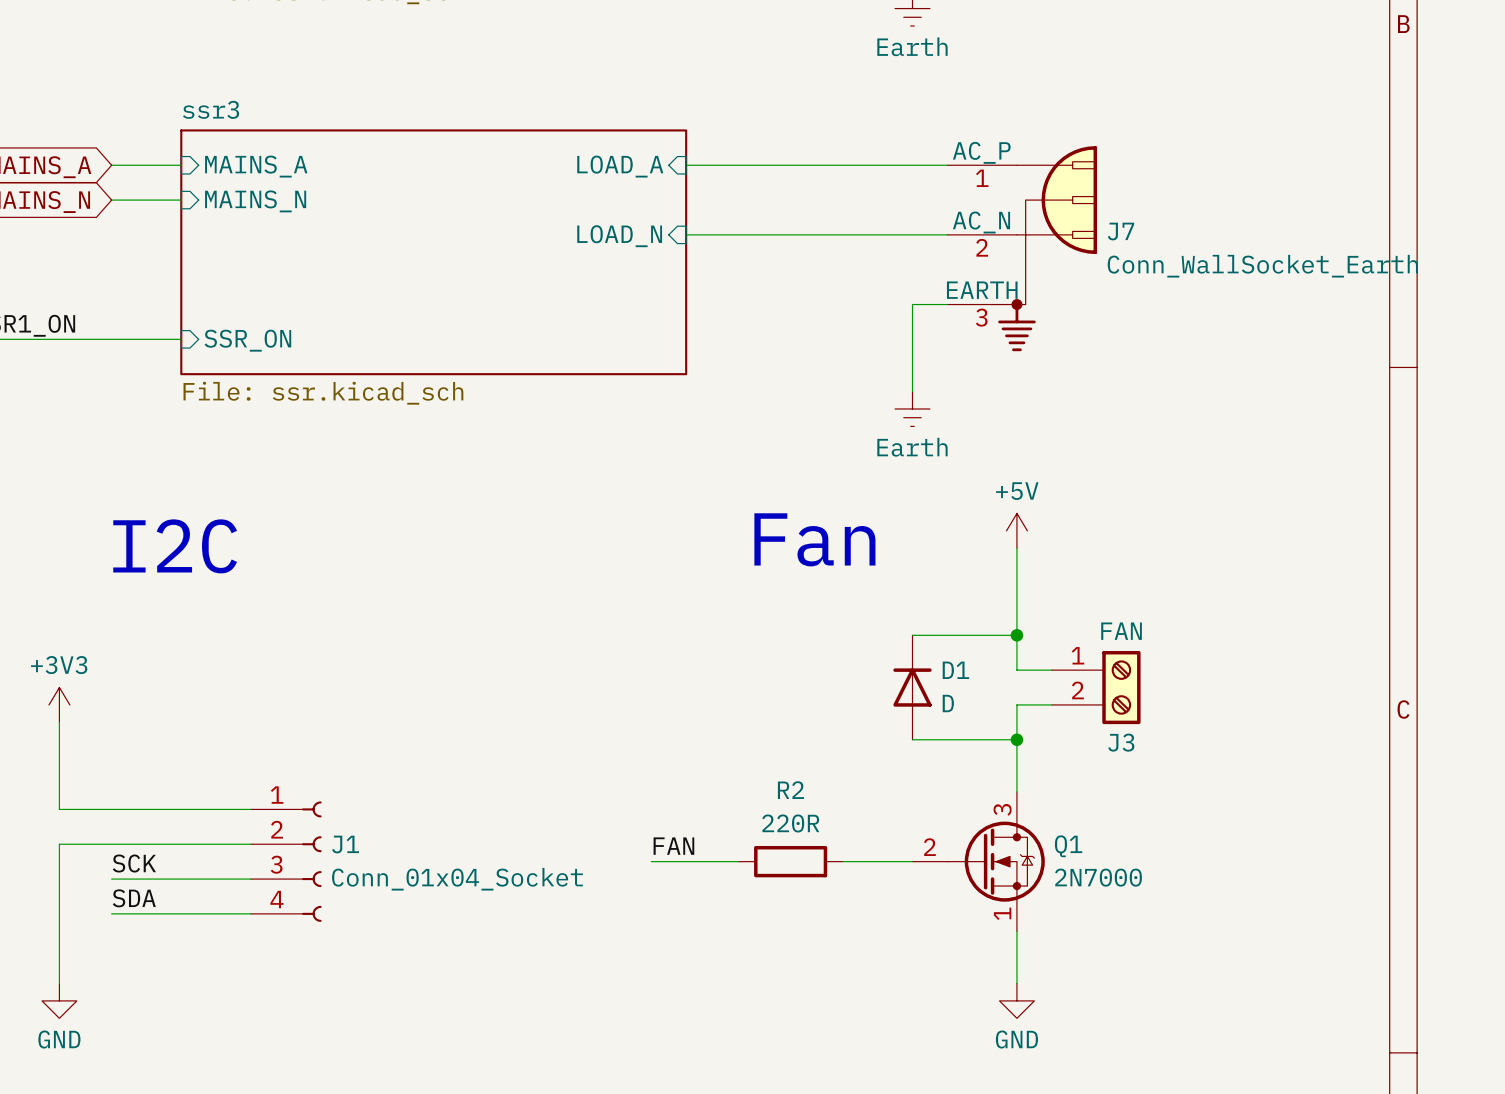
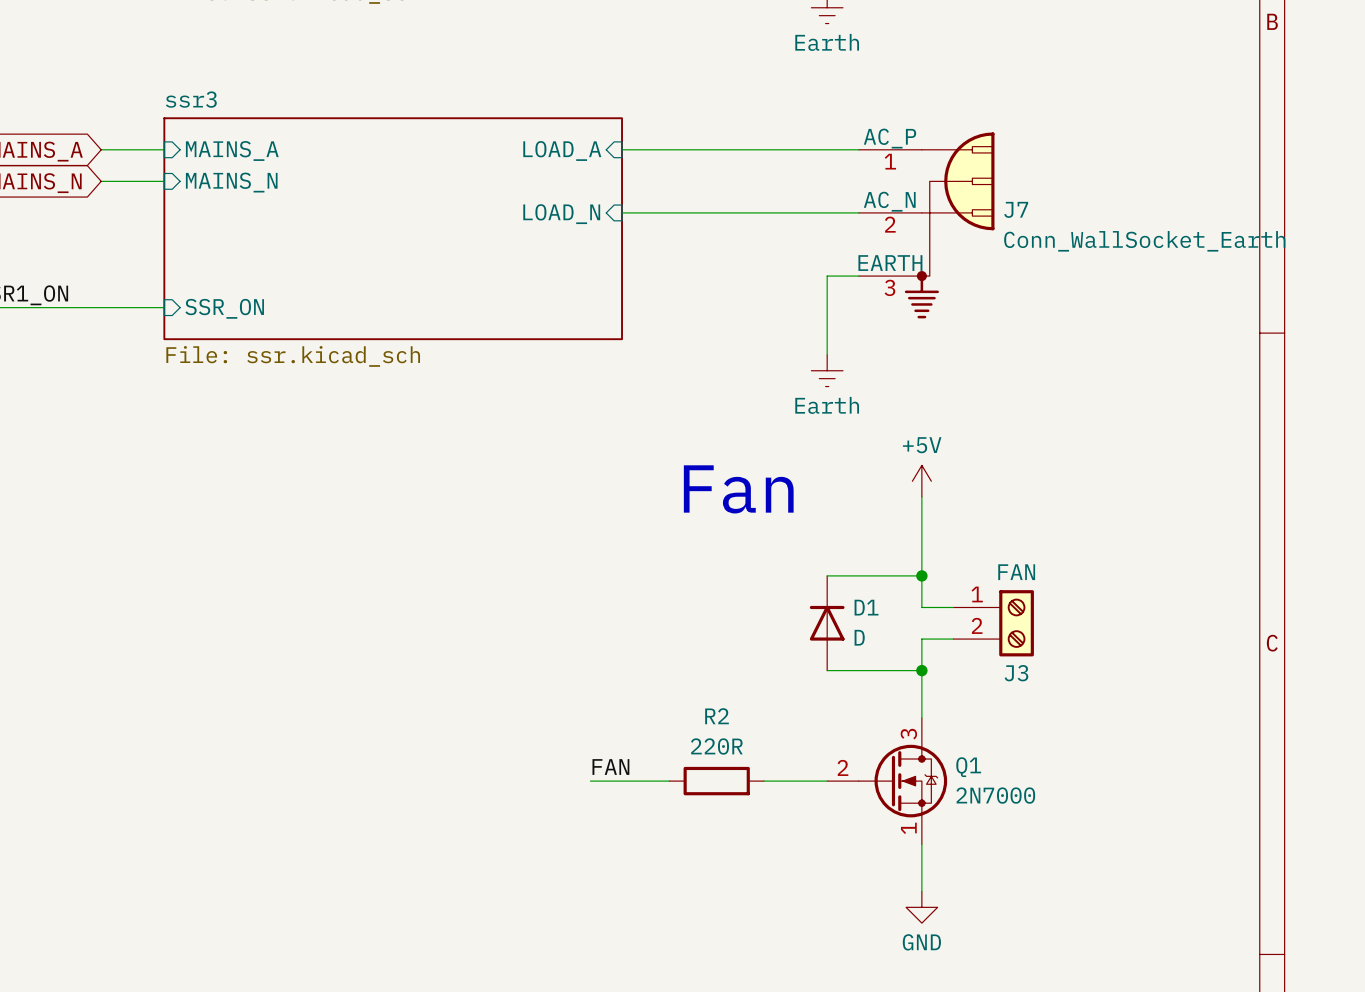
text: I2C (175, 546) -> none
power symbol: +3V3 (59, 704) -> none
wire: (59, 722) (59, 809) (250, 809) -> none
wire: (250, 844) (59, 844) (59, 983) -> none
J1: Conn_01x04_Socket (286, 861) -> none
label: SCK (134, 863) -> none
wire: (111, 879) (250, 879) -> none
label: SDA (134, 898) -> none
wire: (111, 913) (250, 913) -> none
power symbol: GND (59, 1000) -> none

